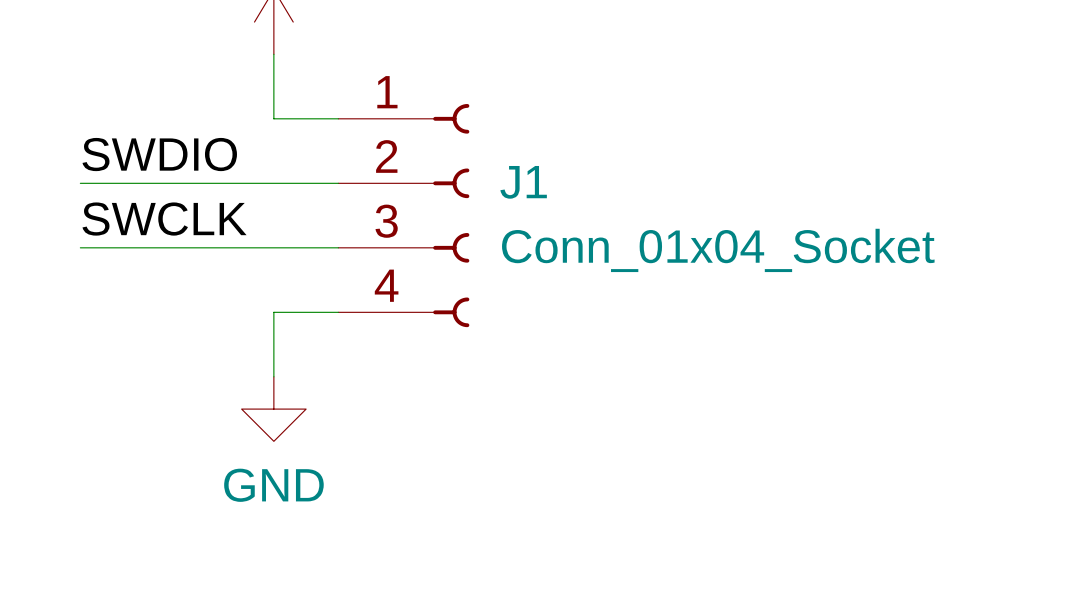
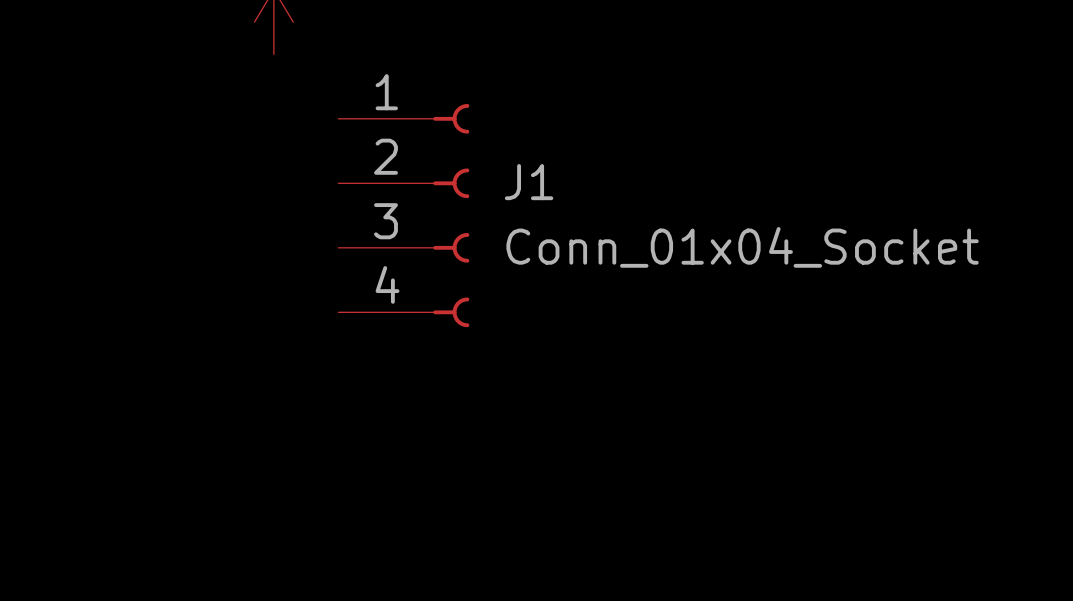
wire: (273, 54) (273, 118) (338, 118) -> none
label: SWDIO (159, 154) -> none
wire: (80, 183) (338, 183) -> none
label: SWCLK (164, 219) -> none
wire: (80, 247) (338, 247) -> none
wire: (338, 312) (273, 312) (273, 376) -> none
power symbol: GND (273, 409) -> none

